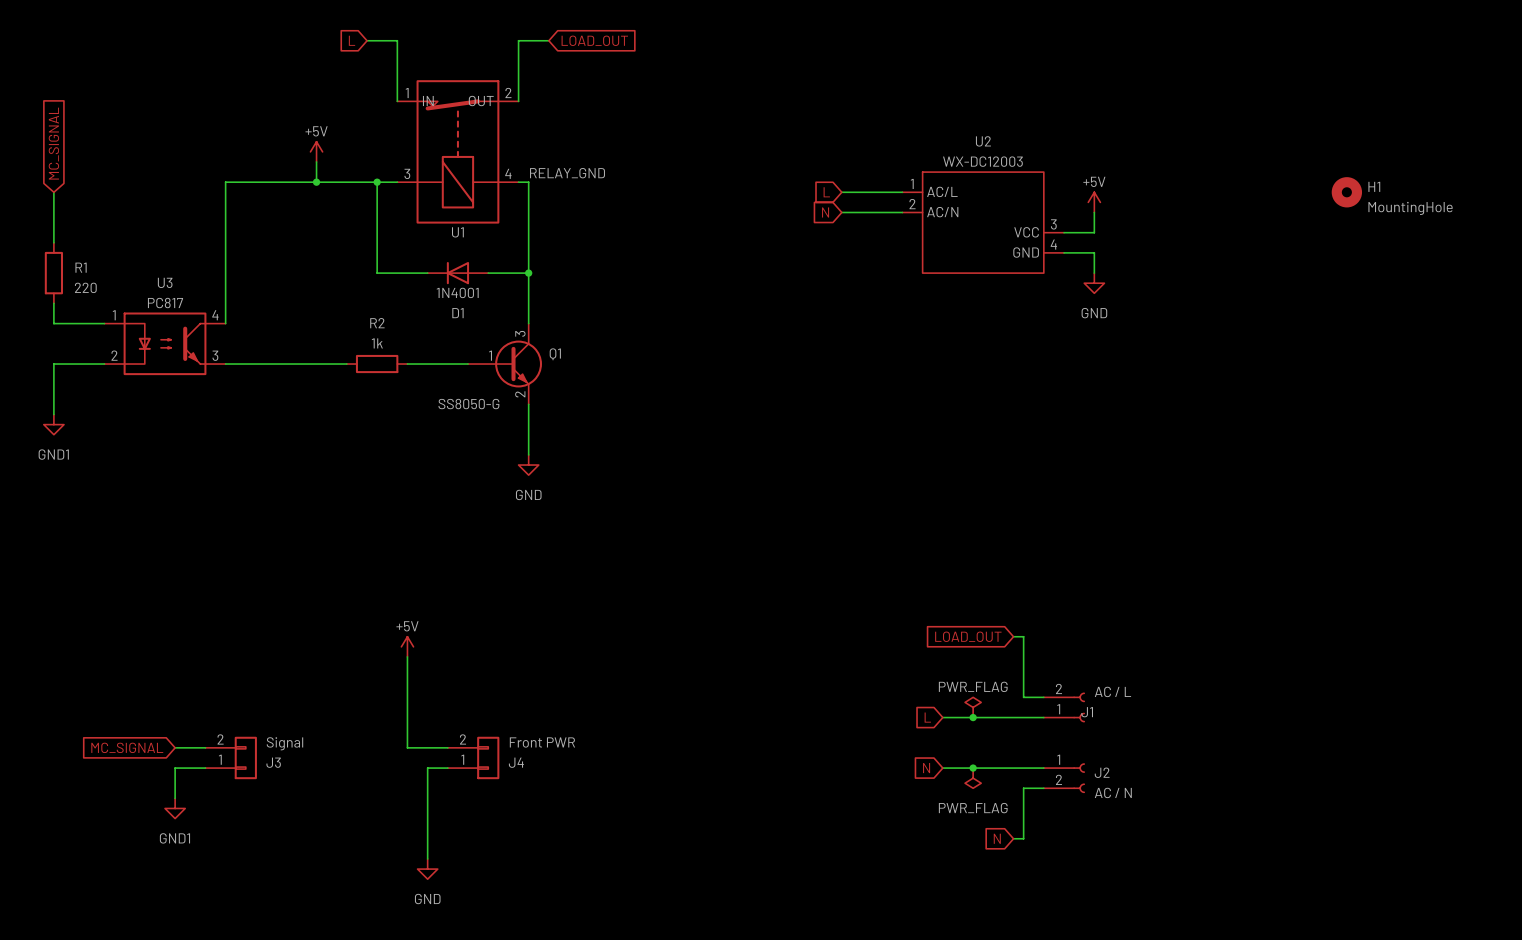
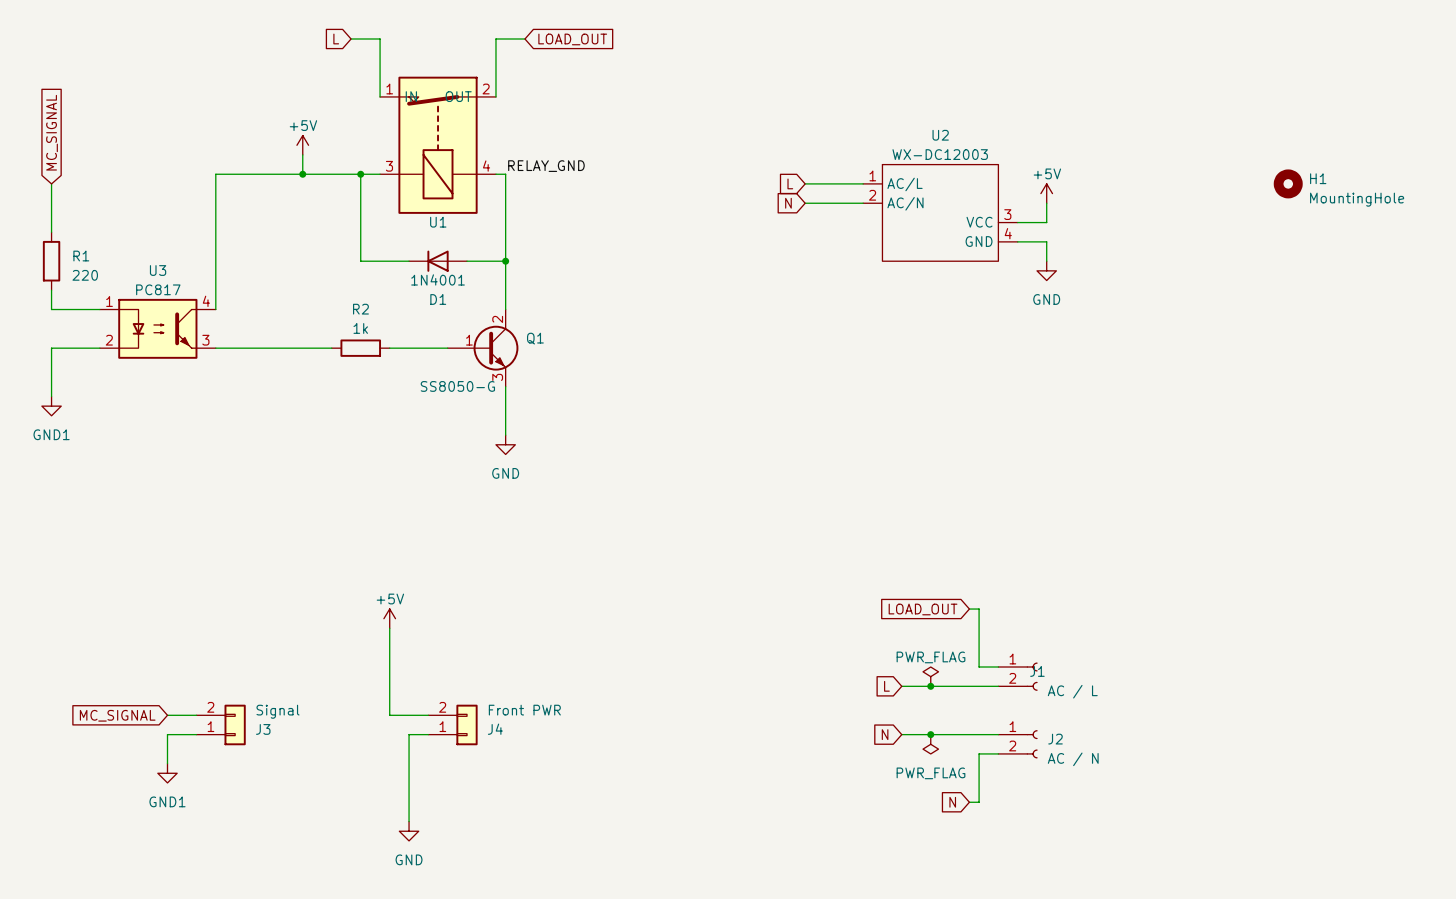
Q1 pin number: 3 (520, 333) -> 2 (497, 319)
Q1 pin number: 2 (520, 394) -> 3 (497, 377)
J1 flip: as is (1079, 707) -> up-down (1032, 676)

